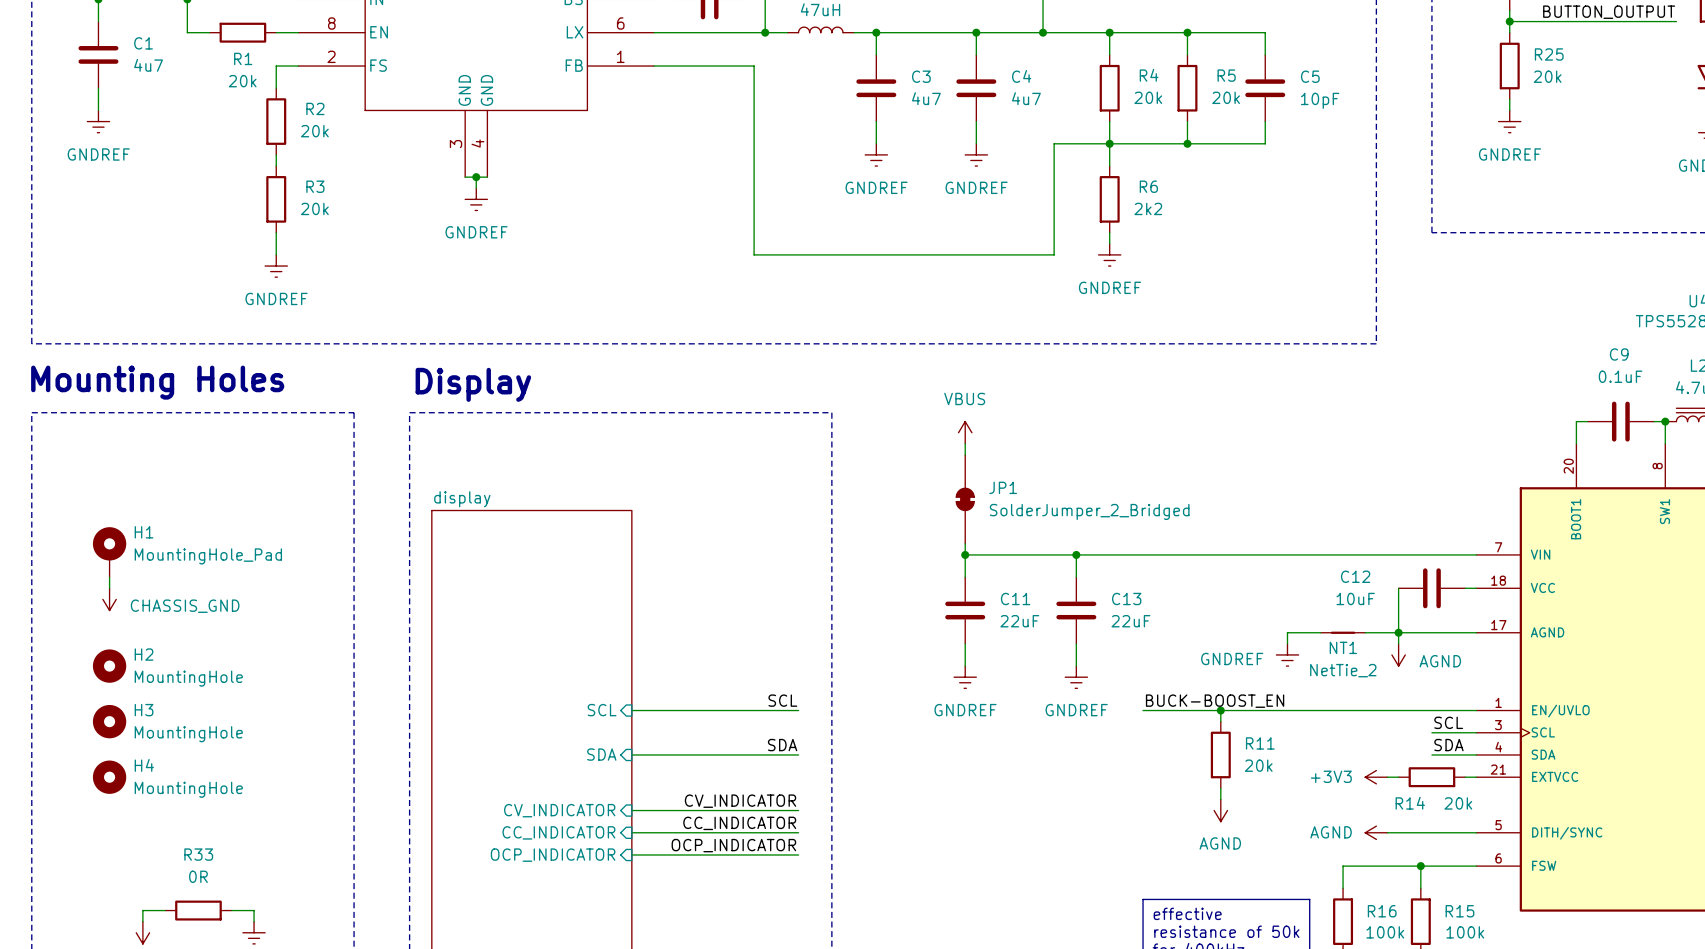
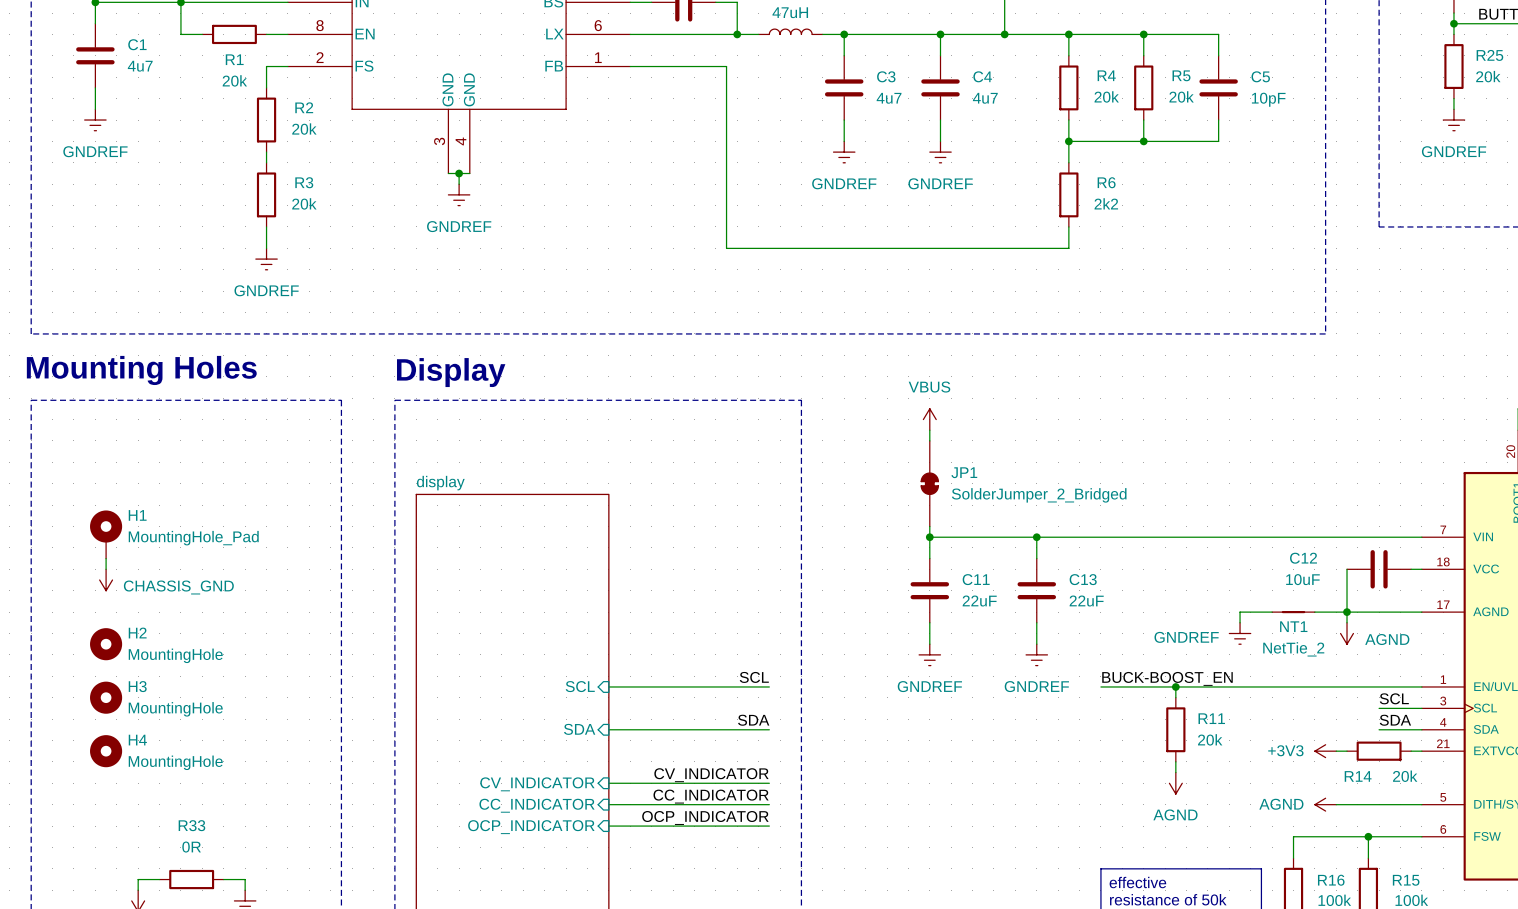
wire: (1109, 143) (1054, 143) (1054, 254) -> (1068, 237) (1068, 248) (1015, 248)
power symbol: GNDREF (1109, 254) -> none

